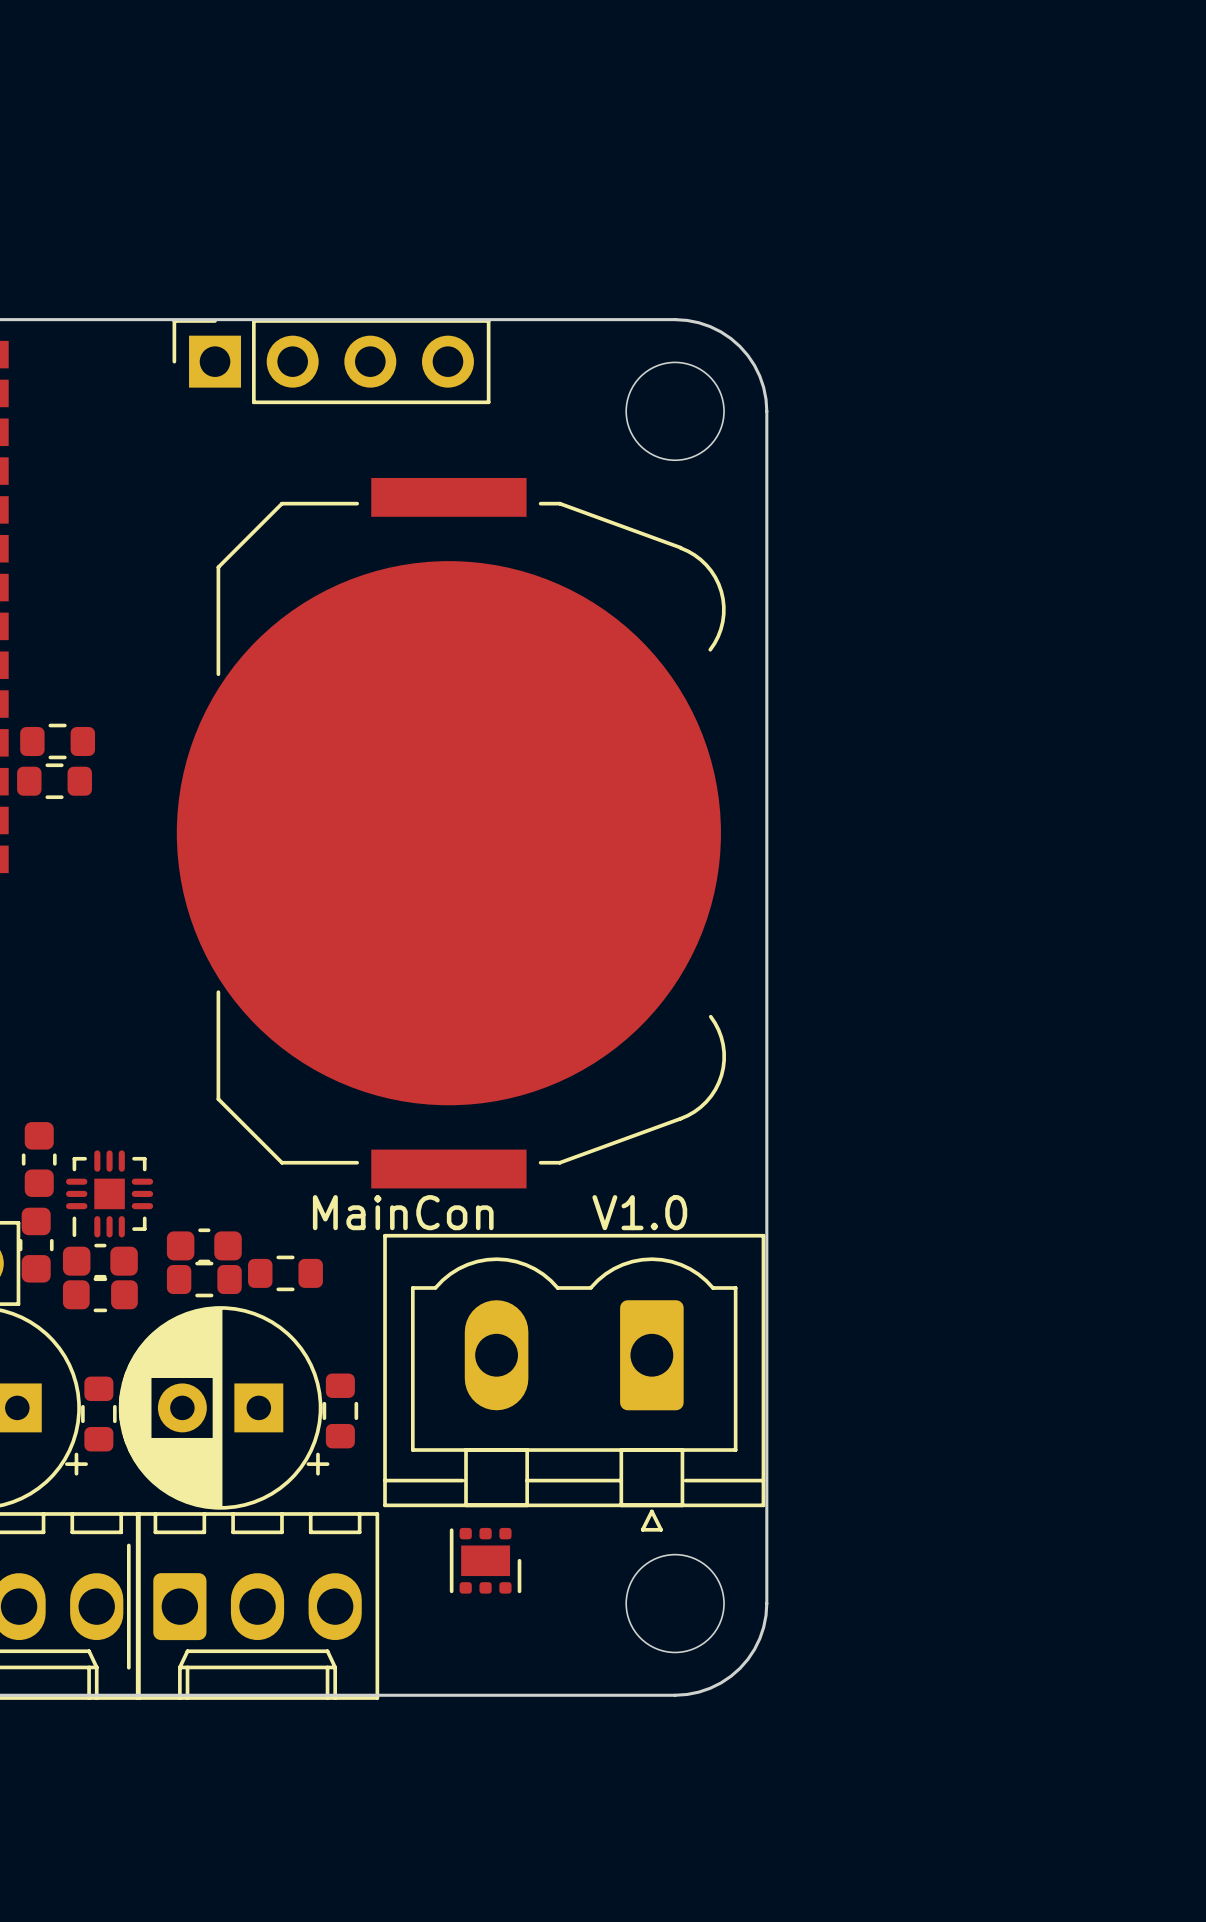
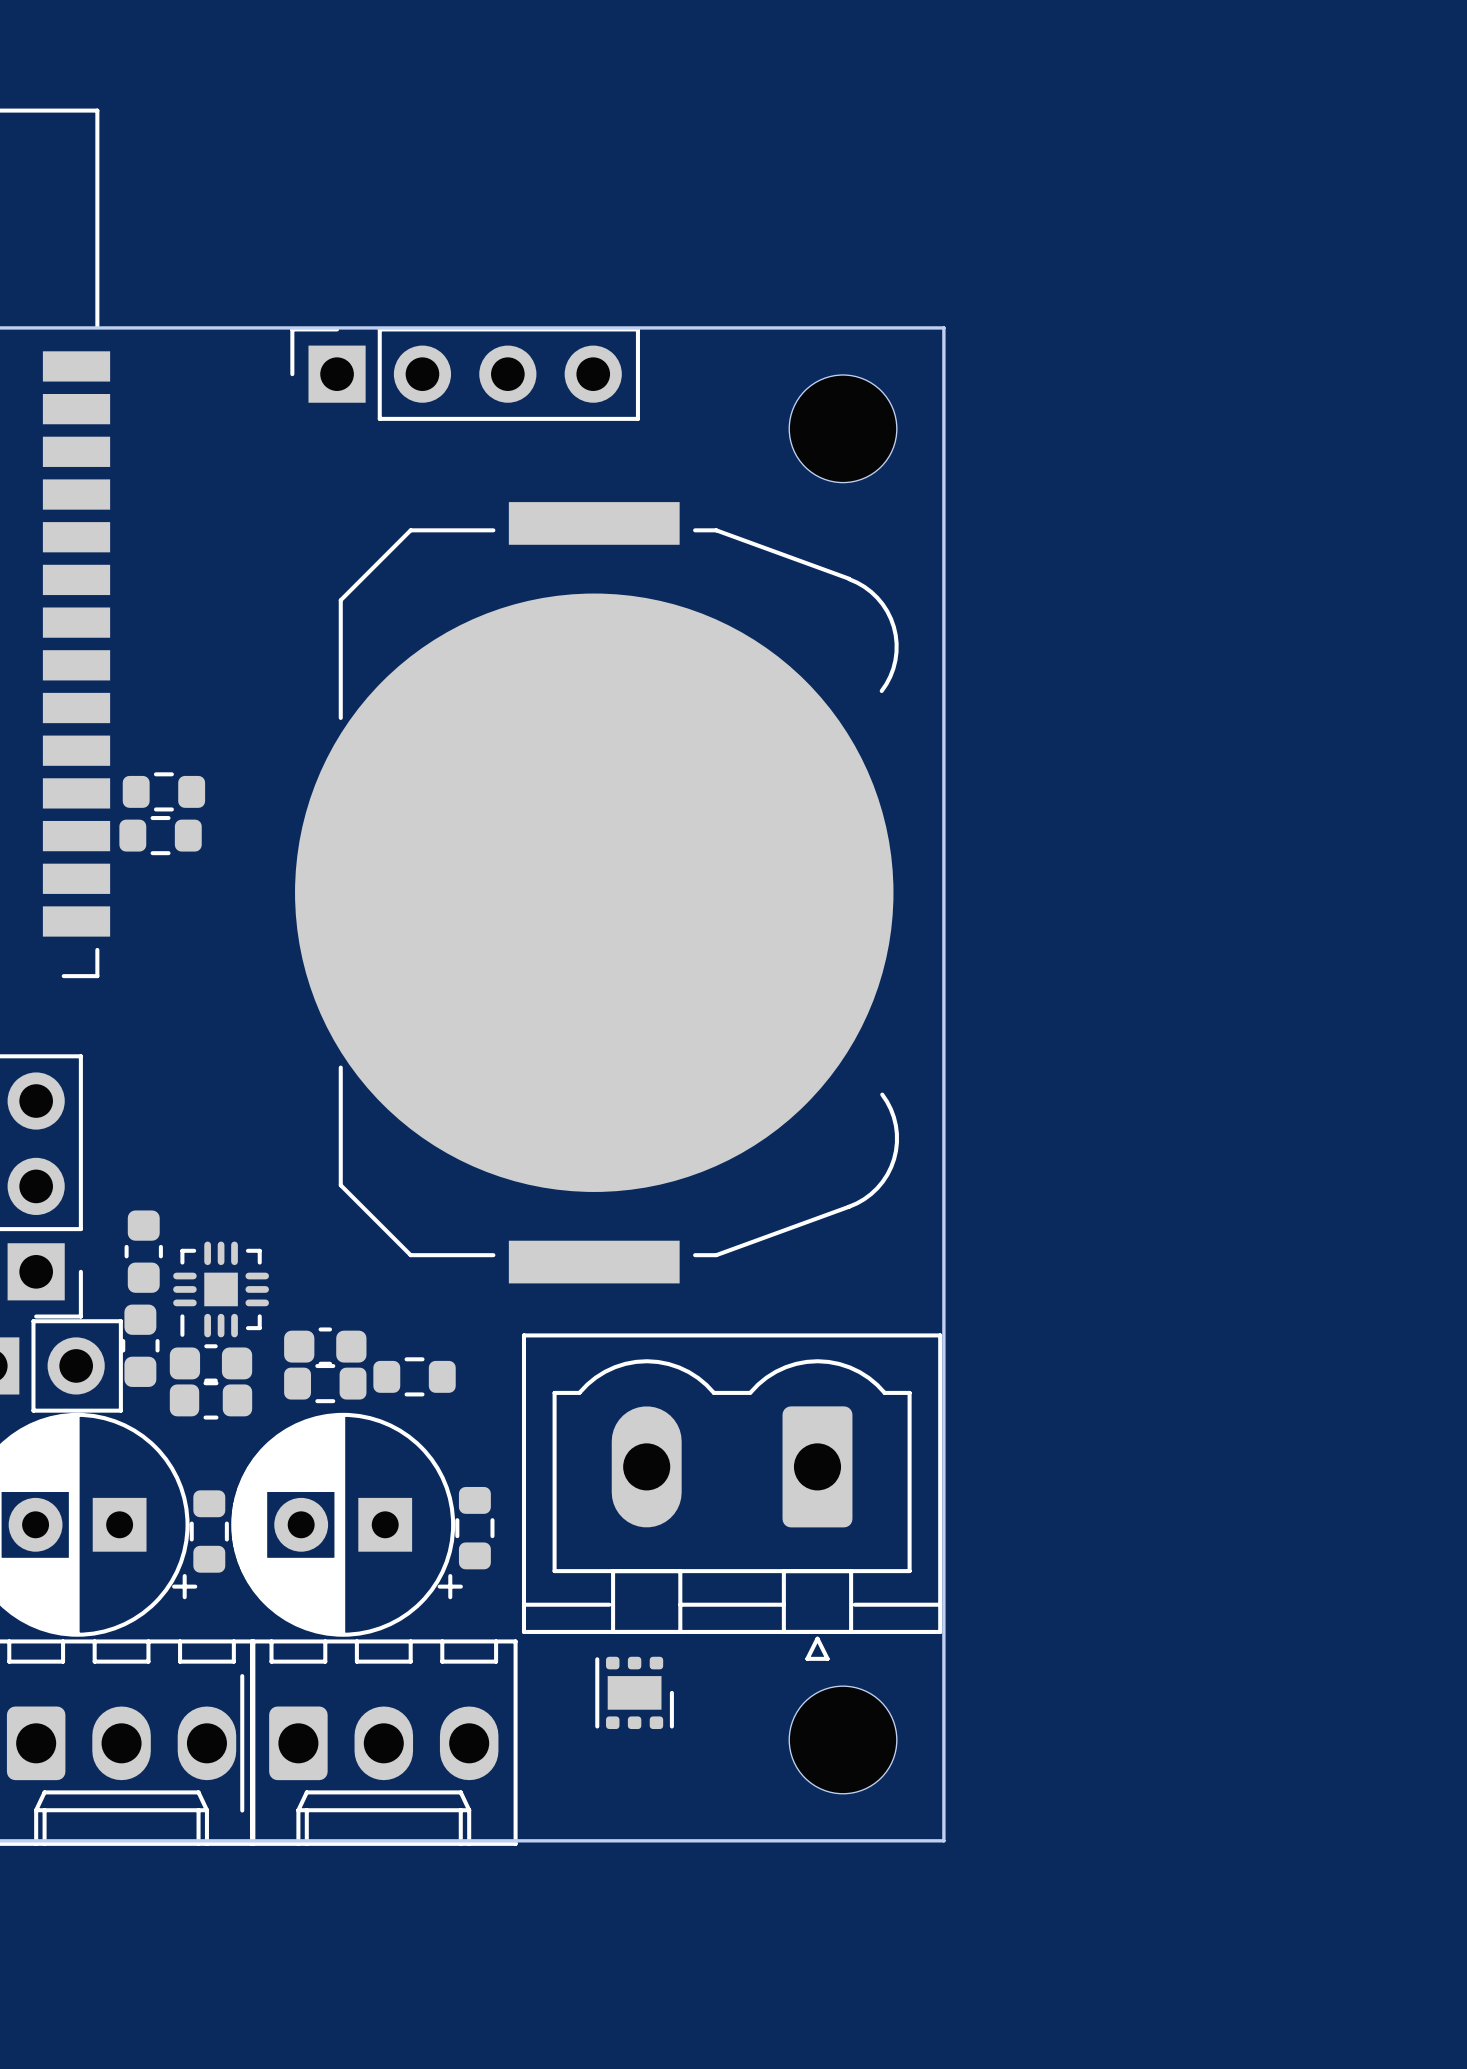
board edge: (675, 319) (698, 322) (710, 326) (730, 338) (739, 346) (754, 365) (759, 376) (763, 387) (766, 411) -> (843, 327) (943, 327) (943, 428)
text: MainCon V1.0 (500, 1212) -> none
board edge: (766, 1603) (766, 1615) (759, 1638) (747, 1659) (739, 1668) (720, 1682) (710, 1688) (698, 1692) (675, 1695) -> (943, 1739) (943, 1840) (843, 1840)

